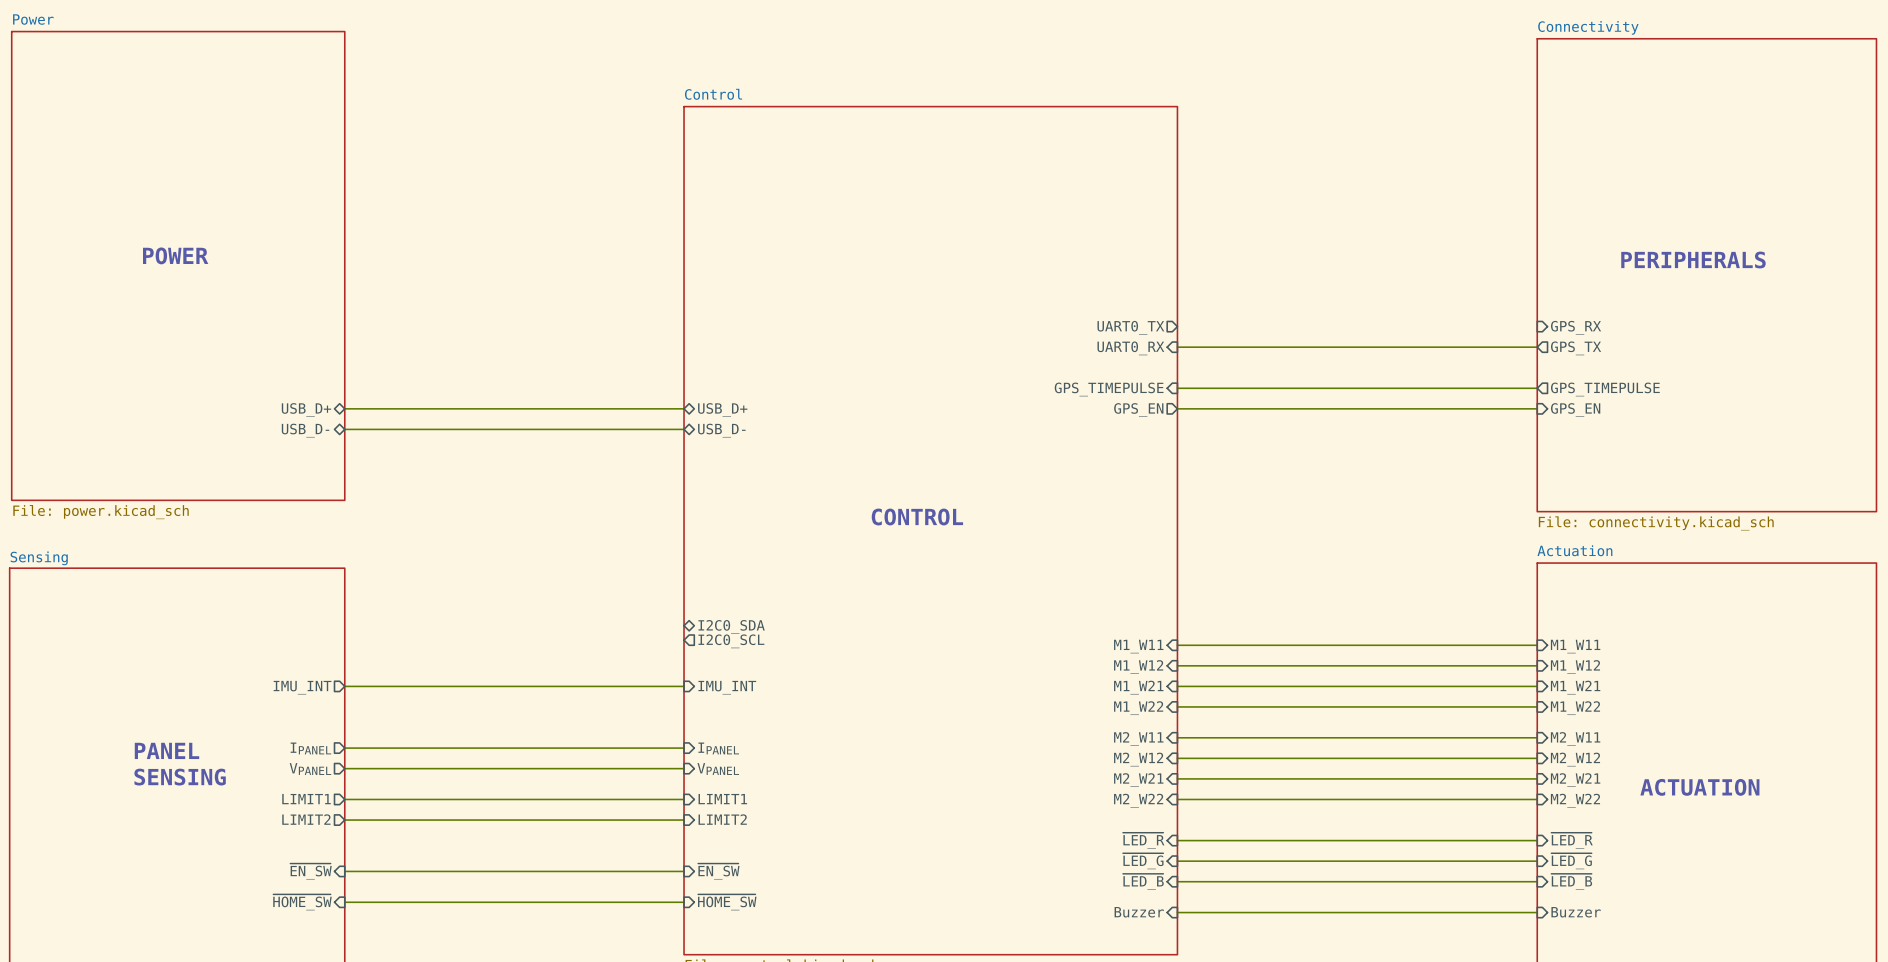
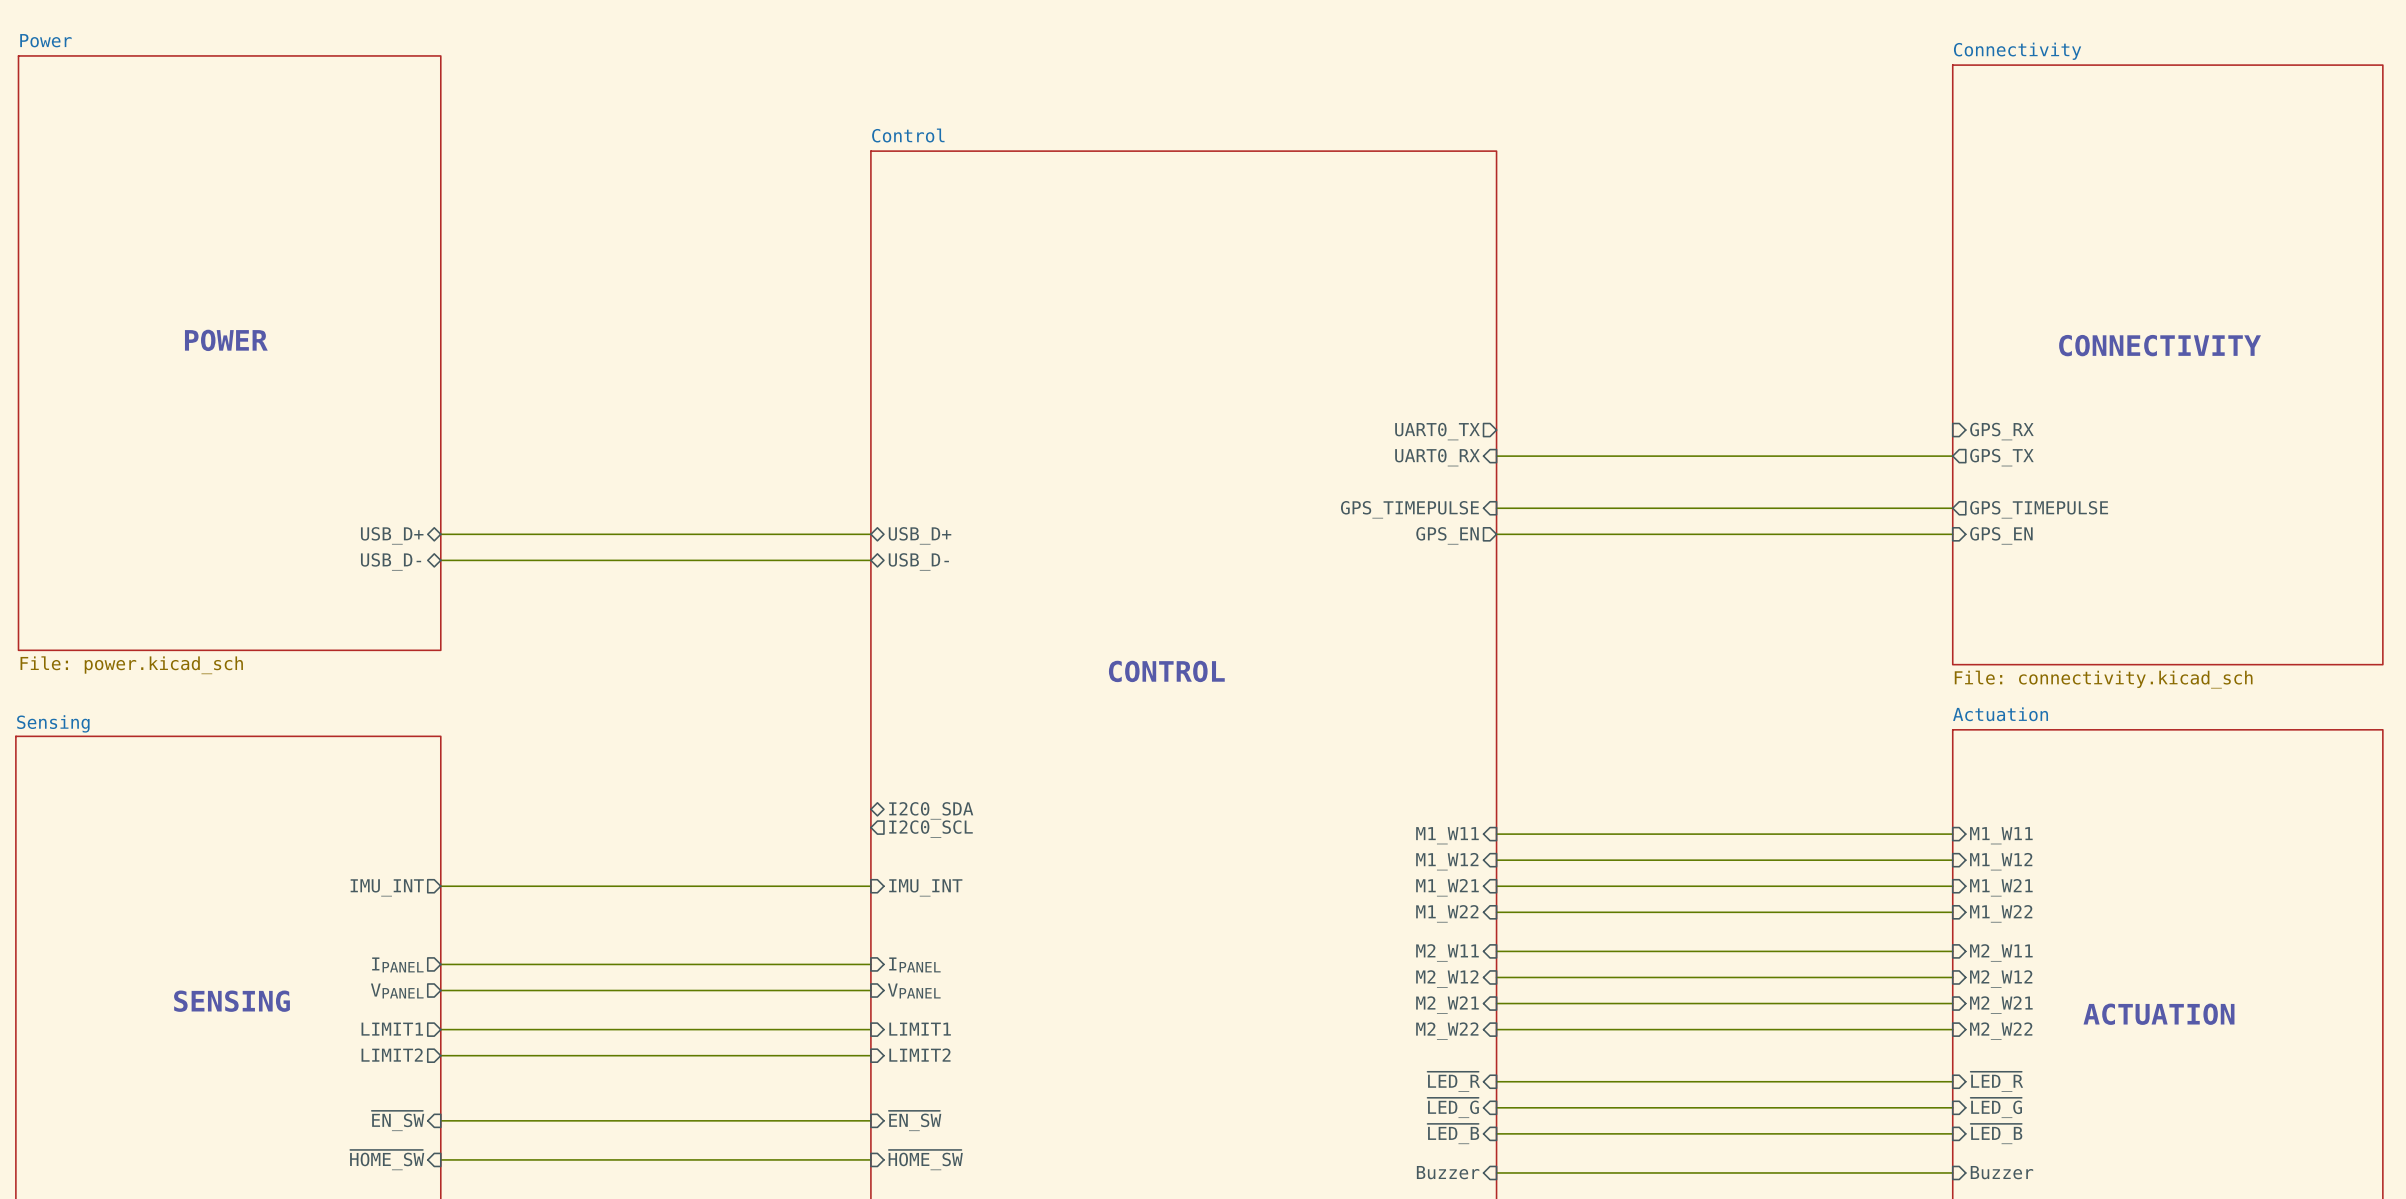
text: PERIPHERALS (1693, 260) -> CONNECTIVITY (2160, 345)
text: PANEL (166, 750) -> none

